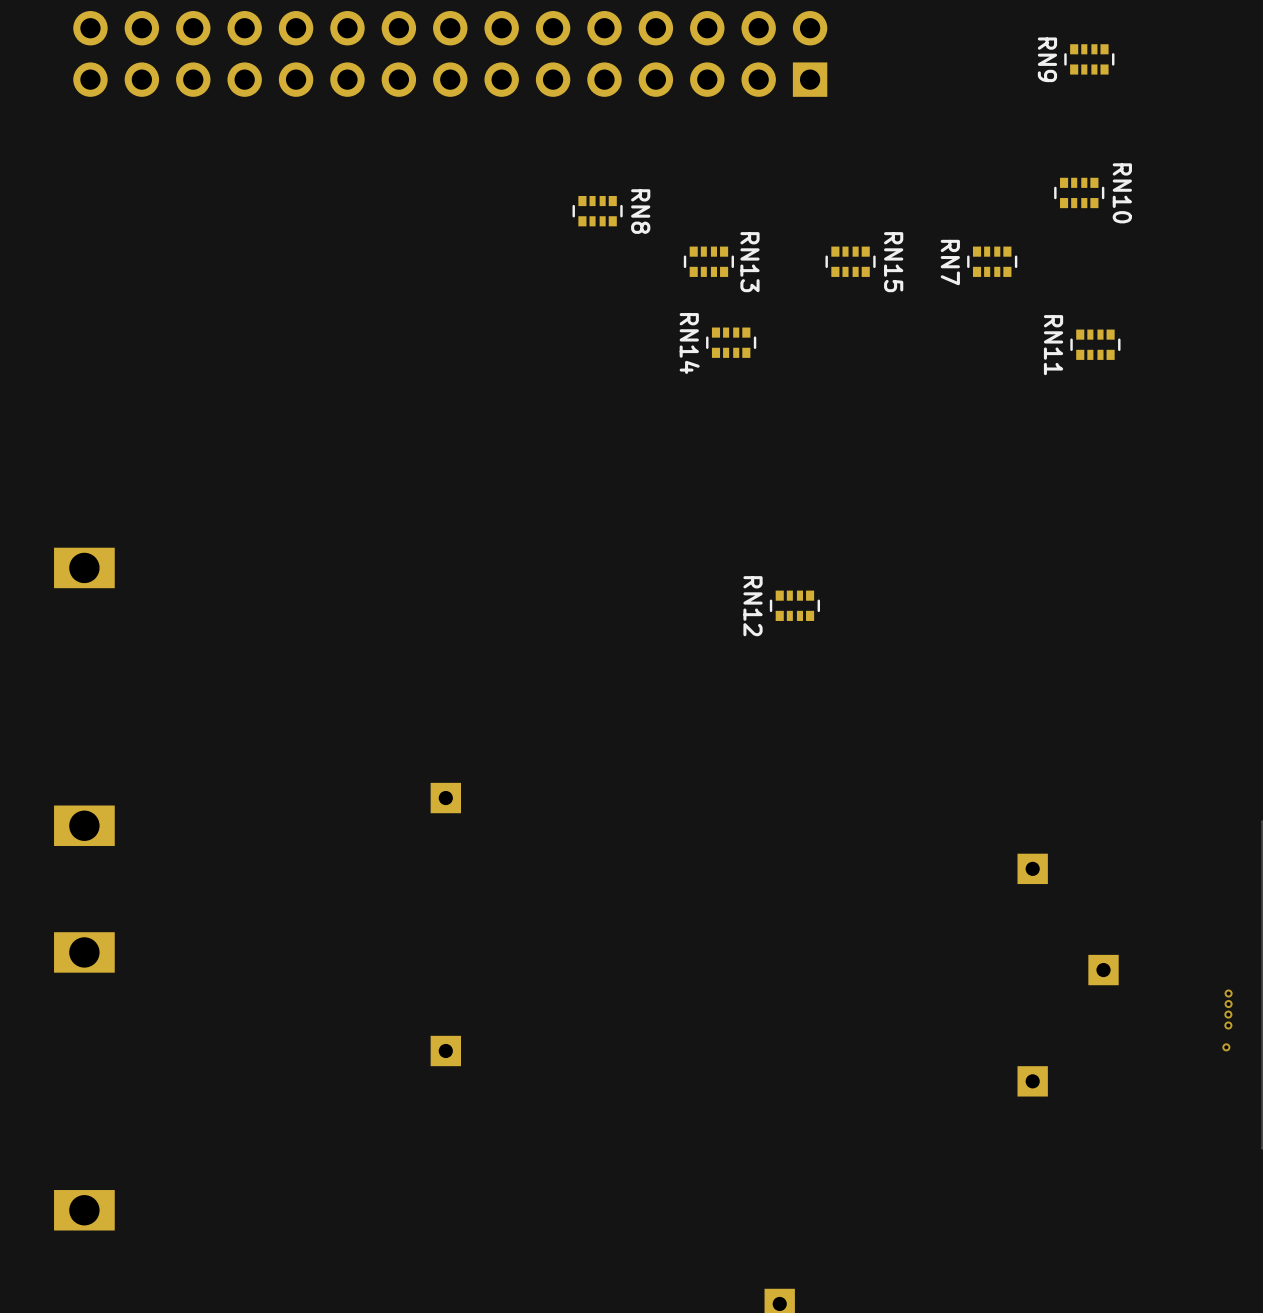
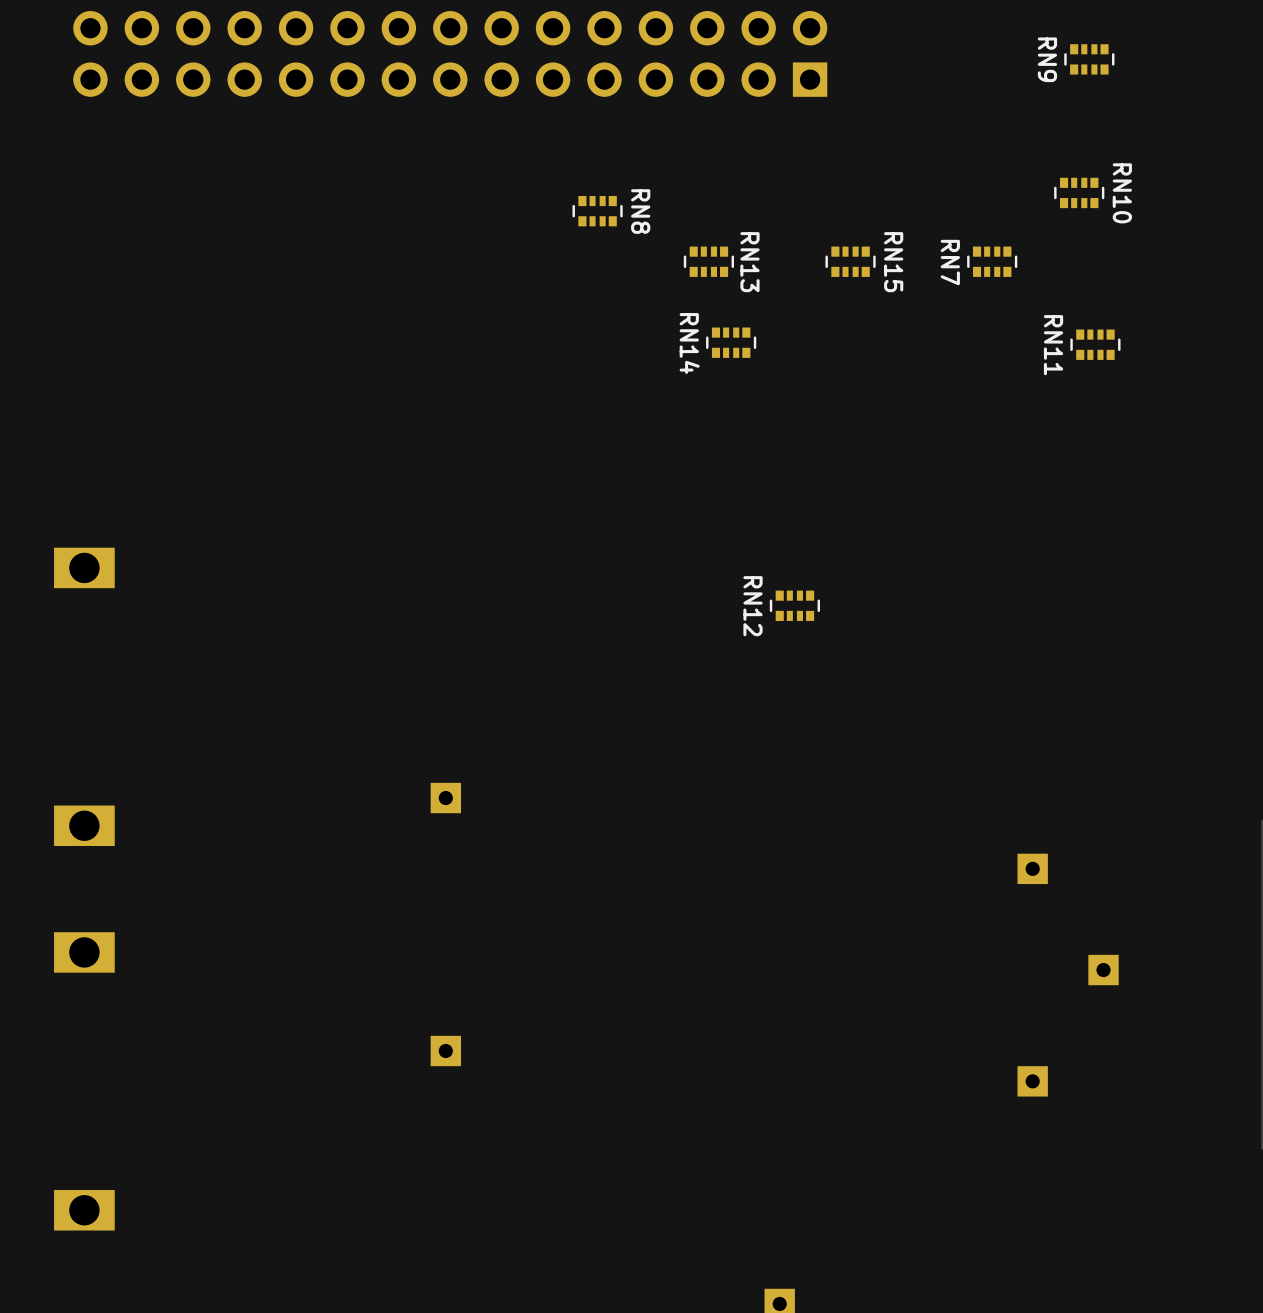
via: (1228, 993) -> none
via: (1228, 1004) -> none
via: (1228, 1014) -> none
via: (1228, 1025) -> none
via: (1226, 1047) -> none

